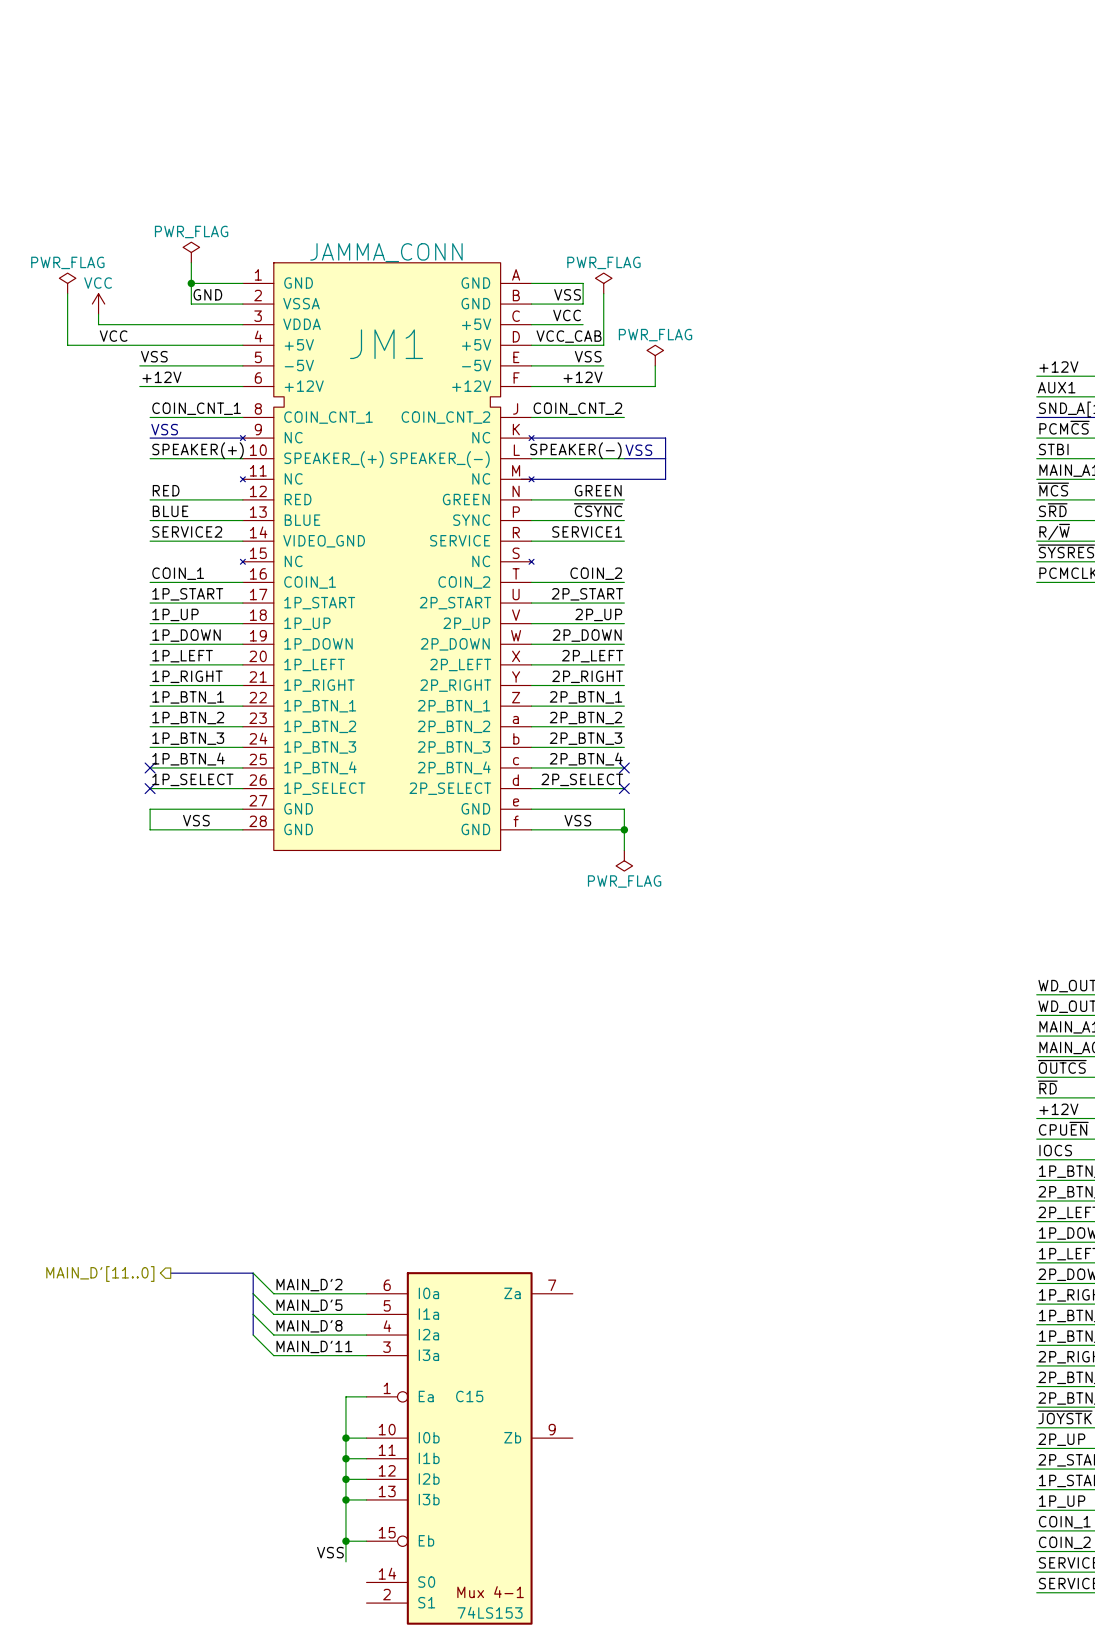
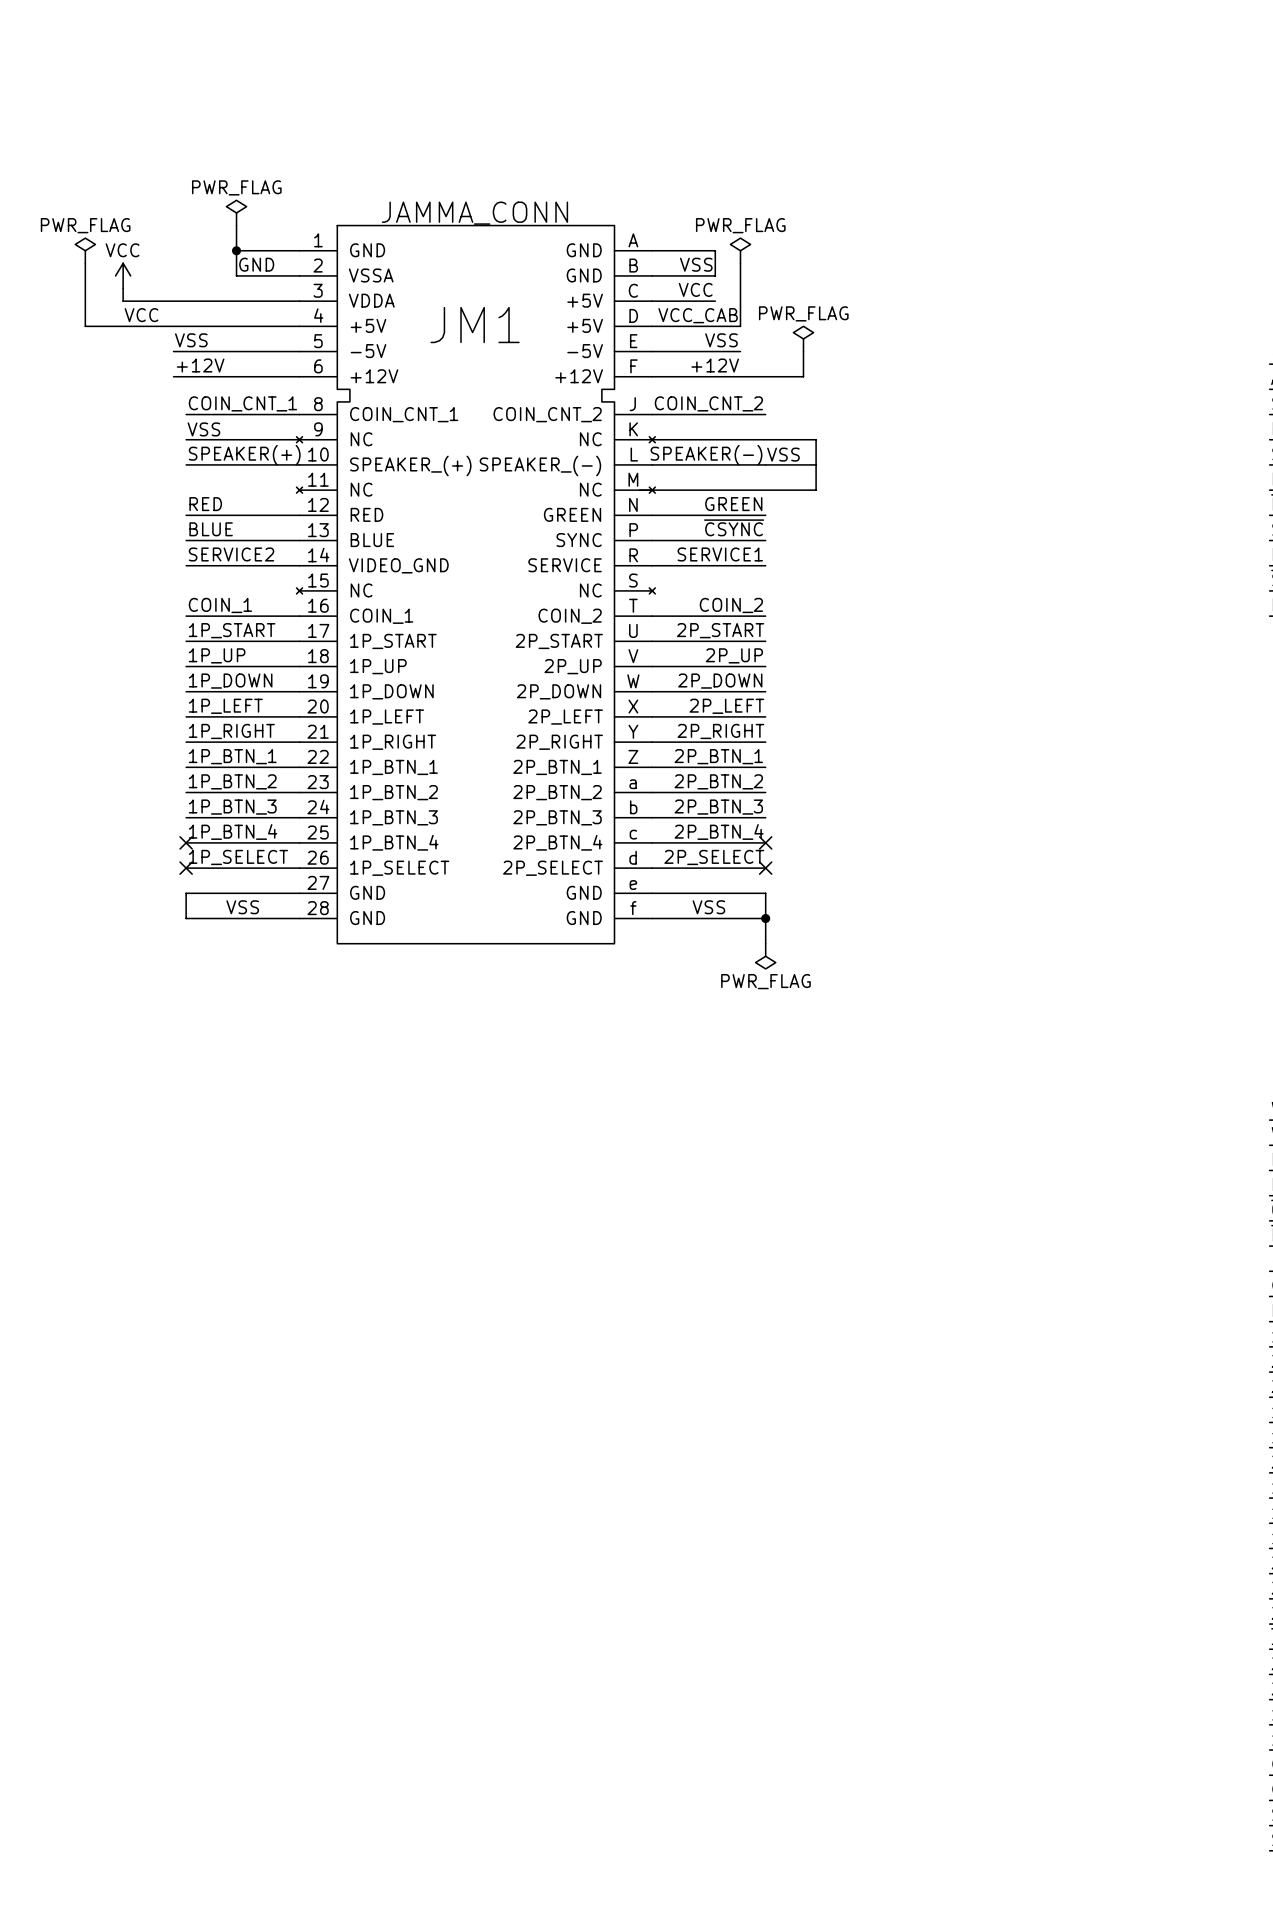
bus: (170, 1273) (253, 1273) (253, 1335) -> none
wire: (253, 1273) (273, 1293) (366, 1293) -> none
hierarchical label: MAIN_D'[11..0] (100, 1274) -> none
label: MAIN_D'2 (309, 1285) -> none
wire: (253, 1293) (273, 1314) (366, 1314) -> none
label: MAIN_D'5 (309, 1305) -> none
wire: (253, 1314) (273, 1335) (366, 1335) -> none
label: MAIN_D'8 (309, 1326) -> none
wire: (253, 1335) (273, 1355) (366, 1355) -> none
label: MAIN_D'11 (314, 1346) -> none
wire: (366, 1396) (345, 1396) (345, 1561) -> none
wire: (345, 1438) (366, 1438) -> none
junction: (345, 1438) -> none
C15: 74LS153 (469, 1448) -> none
wire: (345, 1458) (366, 1458) -> none
junction: (345, 1458) -> none
wire: (345, 1479) (366, 1479) -> none
junction: (345, 1479) -> none
wire: (345, 1499) (366, 1499) -> none
junction: (345, 1499) -> none
wire: (345, 1541) (366, 1541) -> none
junction: (345, 1541) -> none
label: VSS (330, 1552) -> none

